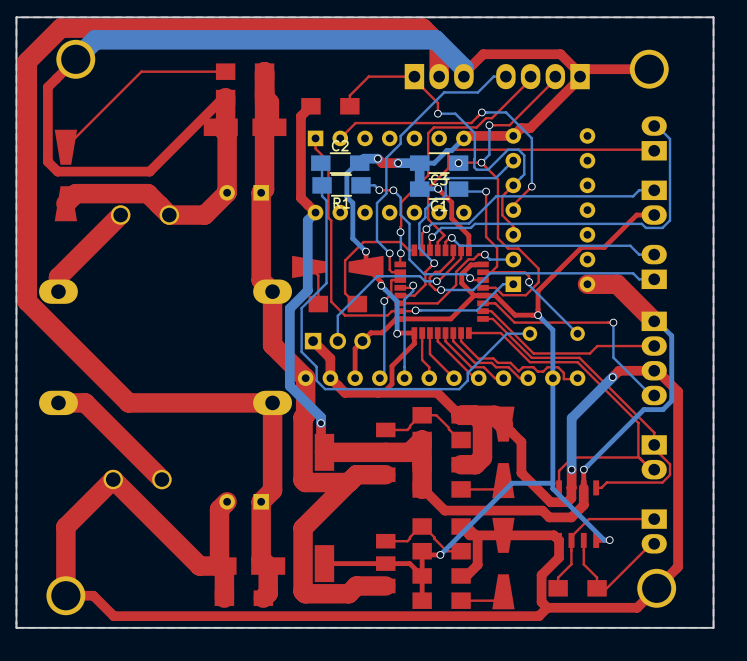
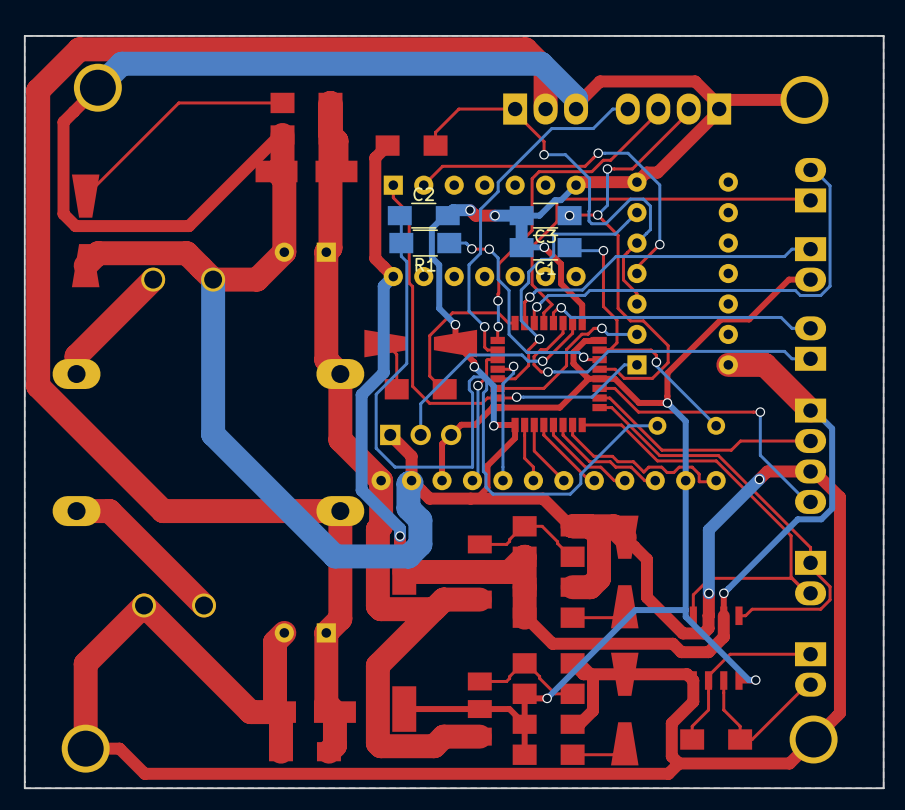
bottom track: none -> (213, 279) (213, 434) (335, 556) (408, 556) (420, 544) (420, 520) (408, 508) (408, 483) (411, 483)
bottom track: (316, 366) (316, 380) (325, 389) (396, 389) -> (394, 466) (472, 467) (472, 393) (469, 389) (469, 381) (473, 376) (482, 376) (486, 381) (486, 389) (483, 393) (483, 471) (485, 474) (485, 487) (493, 494)

